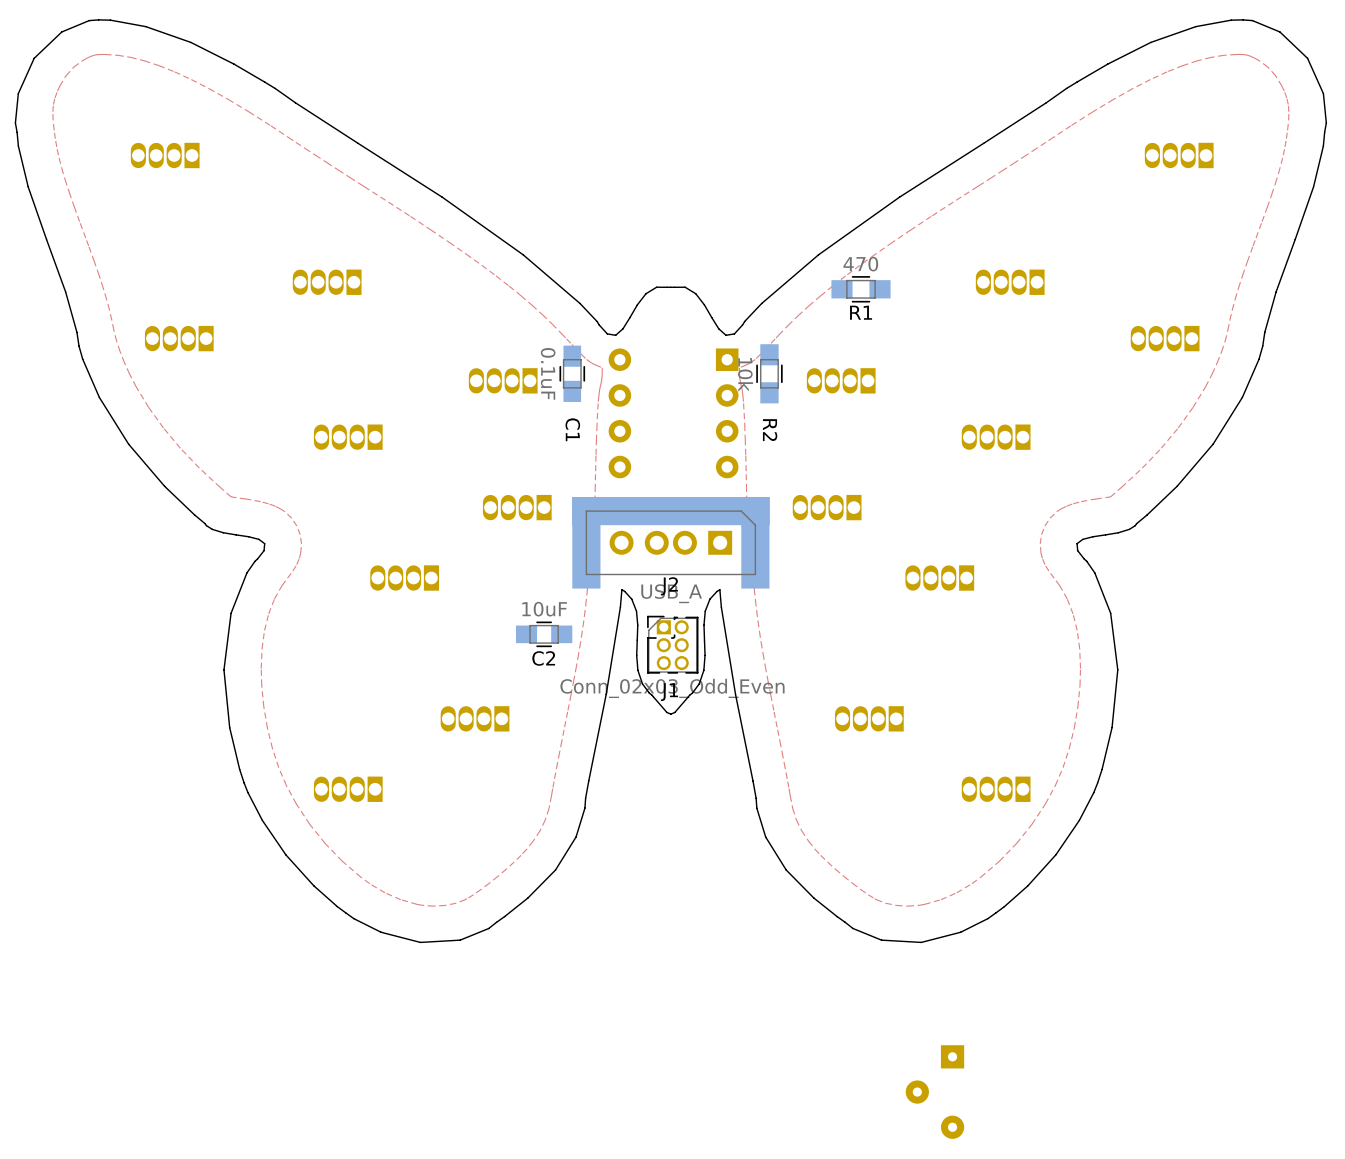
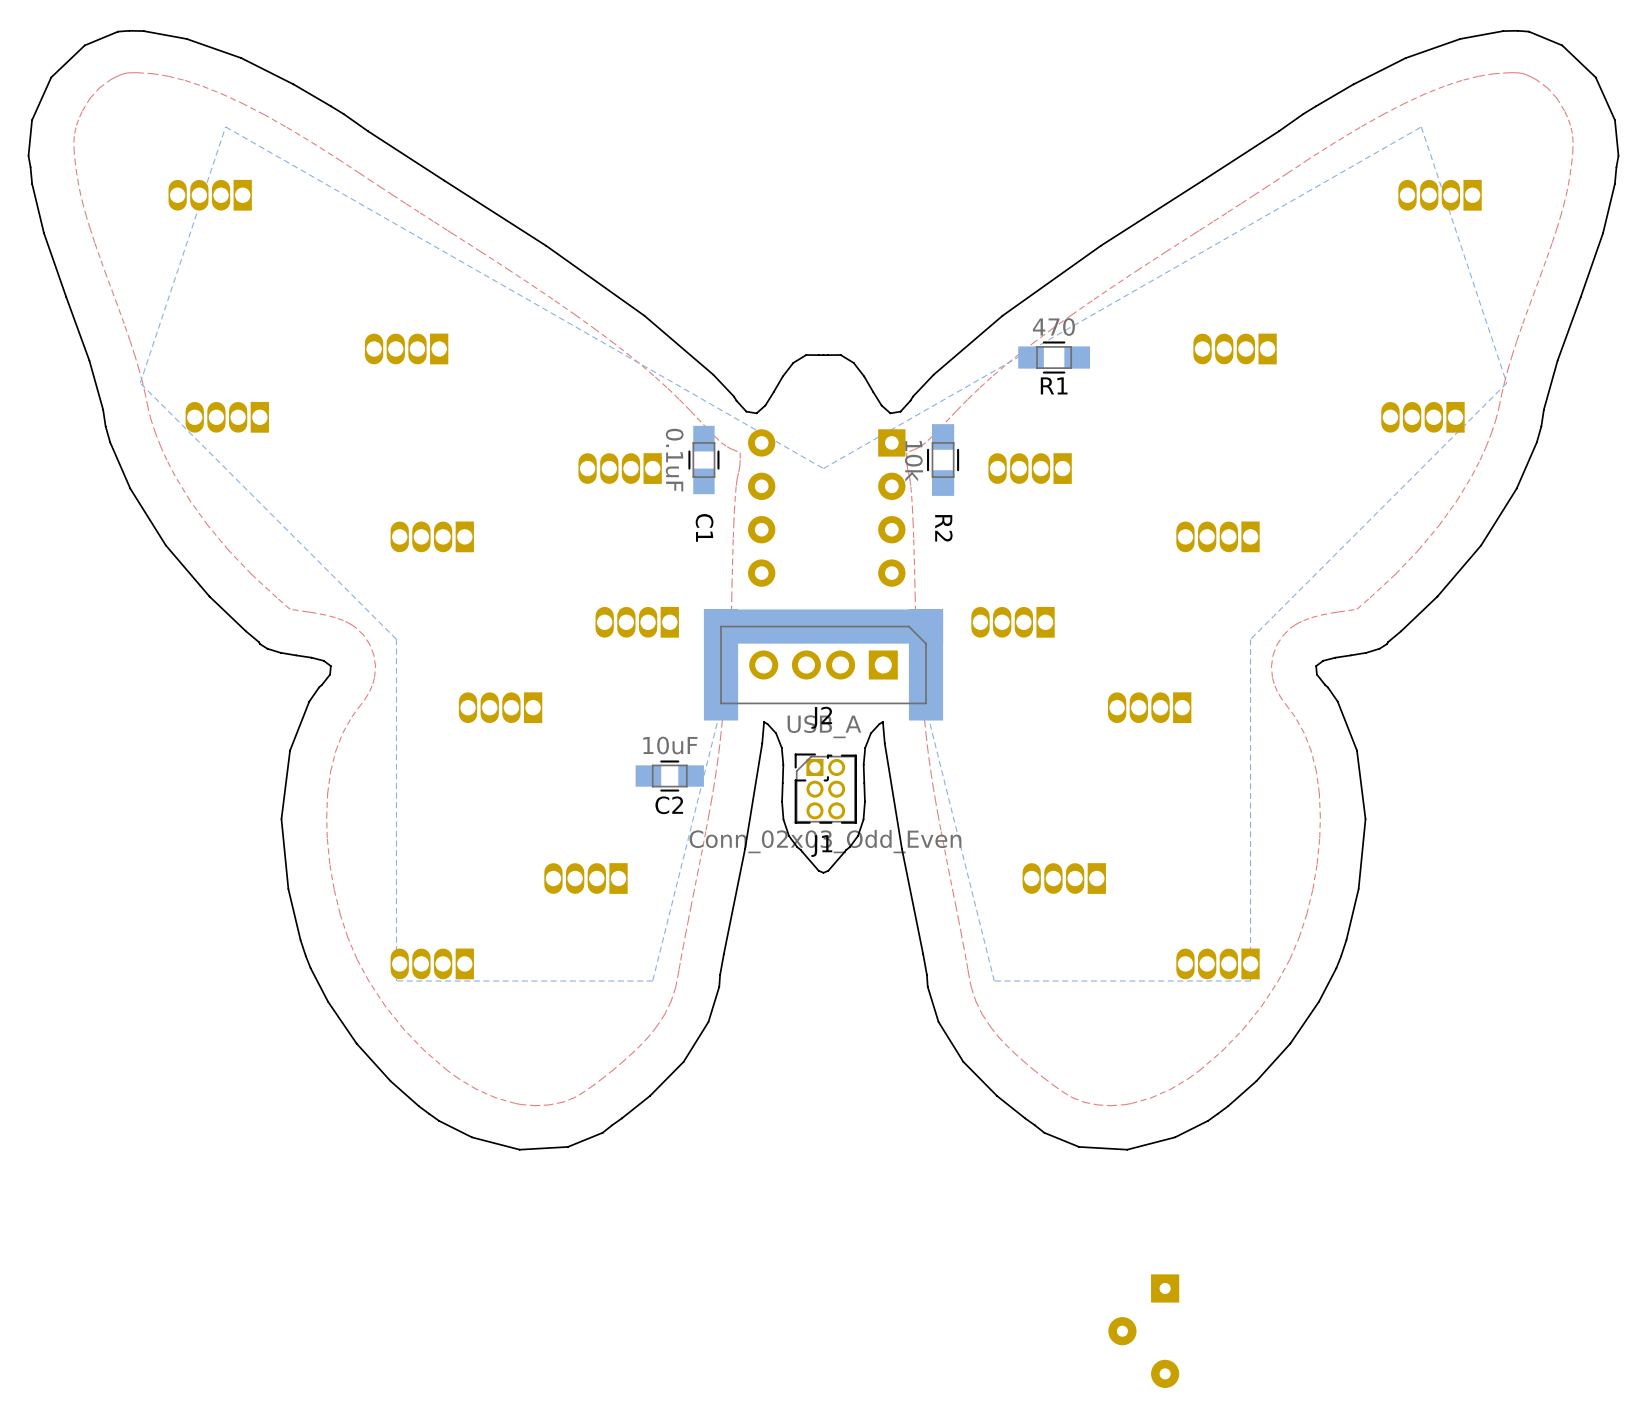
bottom zone outline: none -> (1421, 126) (823, 468) (225, 126) (140, 383) (396, 639) (396, 981) (652, 981) (738, 639) (908, 639) (994, 981) (1250, 981) (1250, 639) (1506, 383) (1421, 126)

